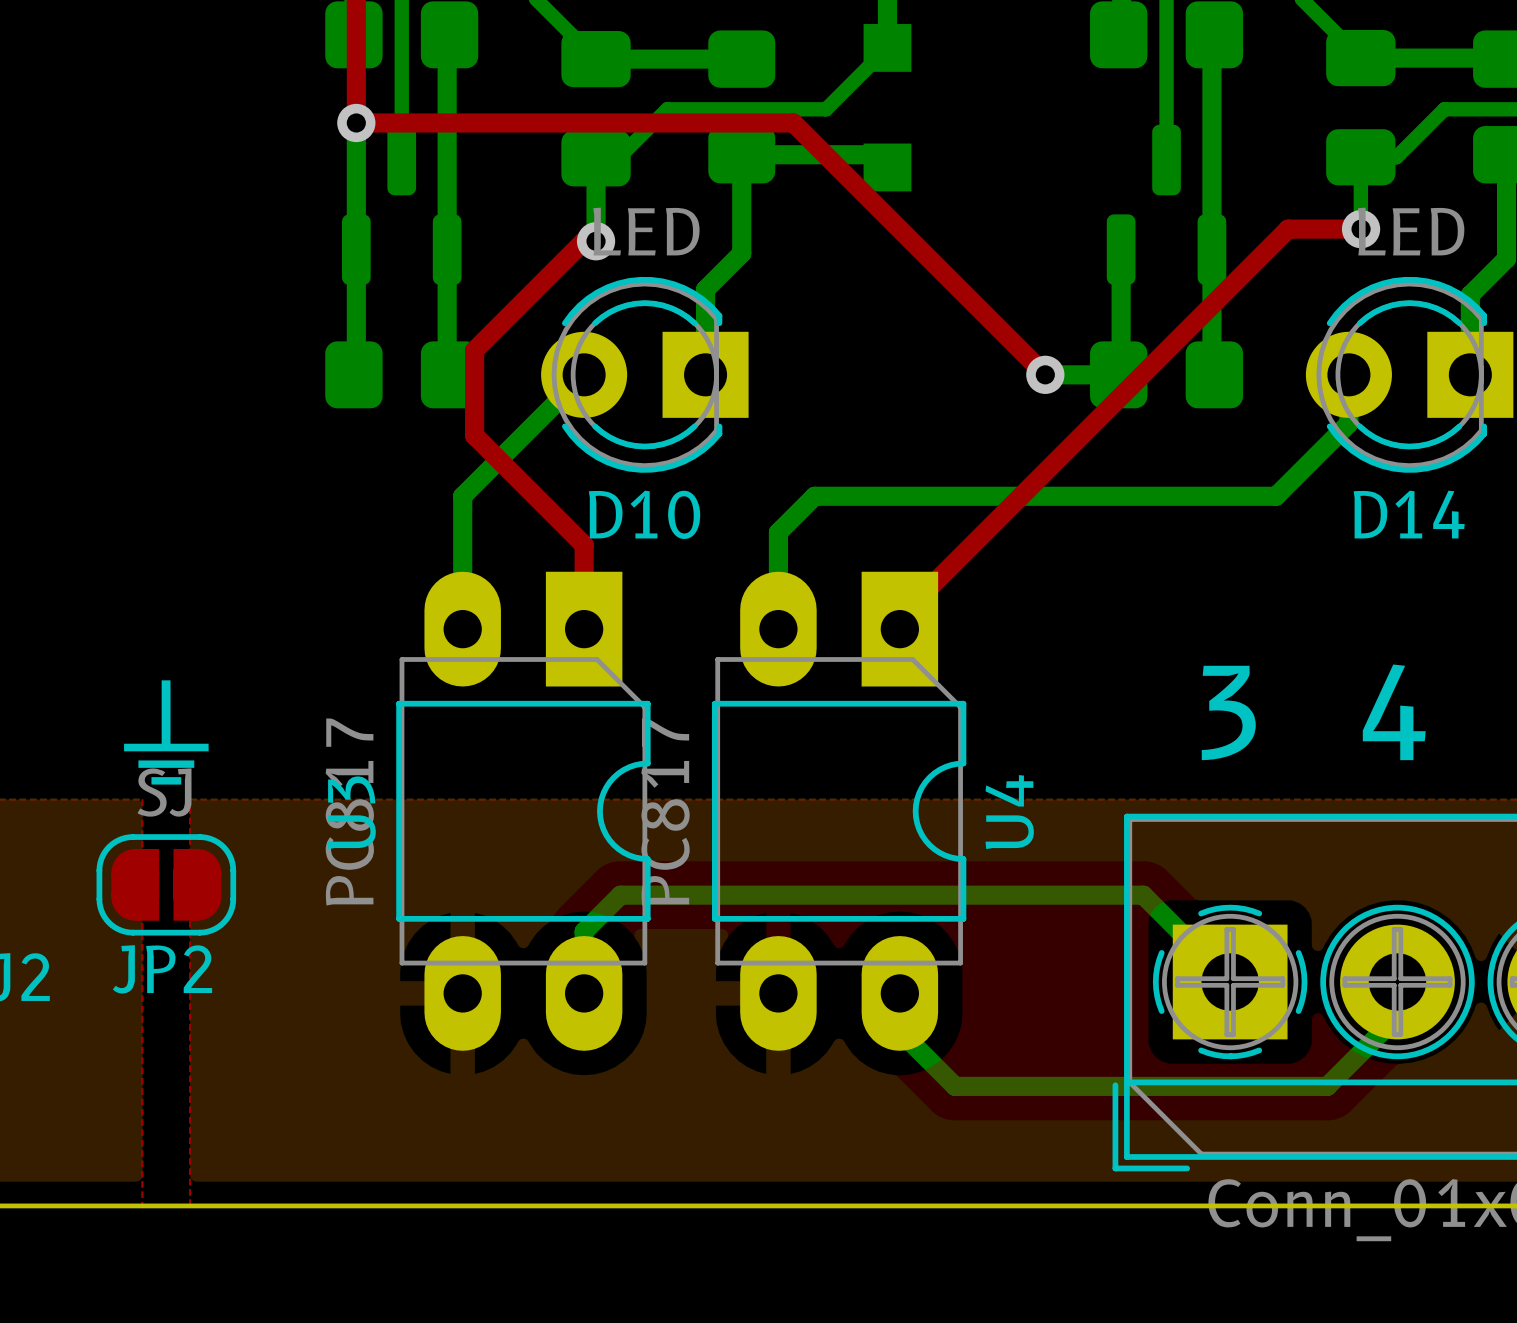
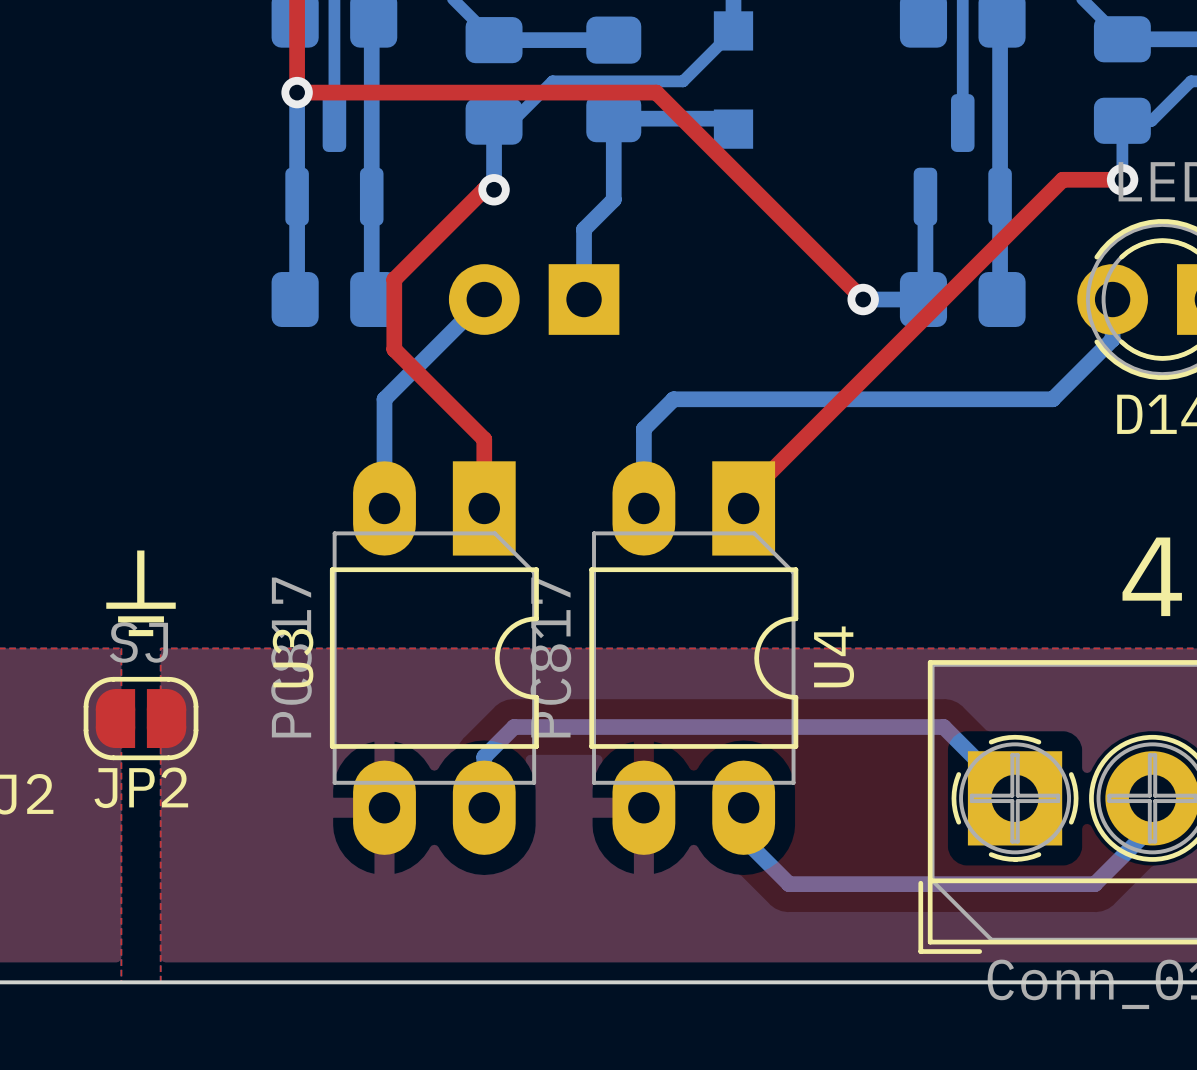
D10 side: top (644, 374) -> bottom (534, 299)
text: 3 (1228, 712) -> none

